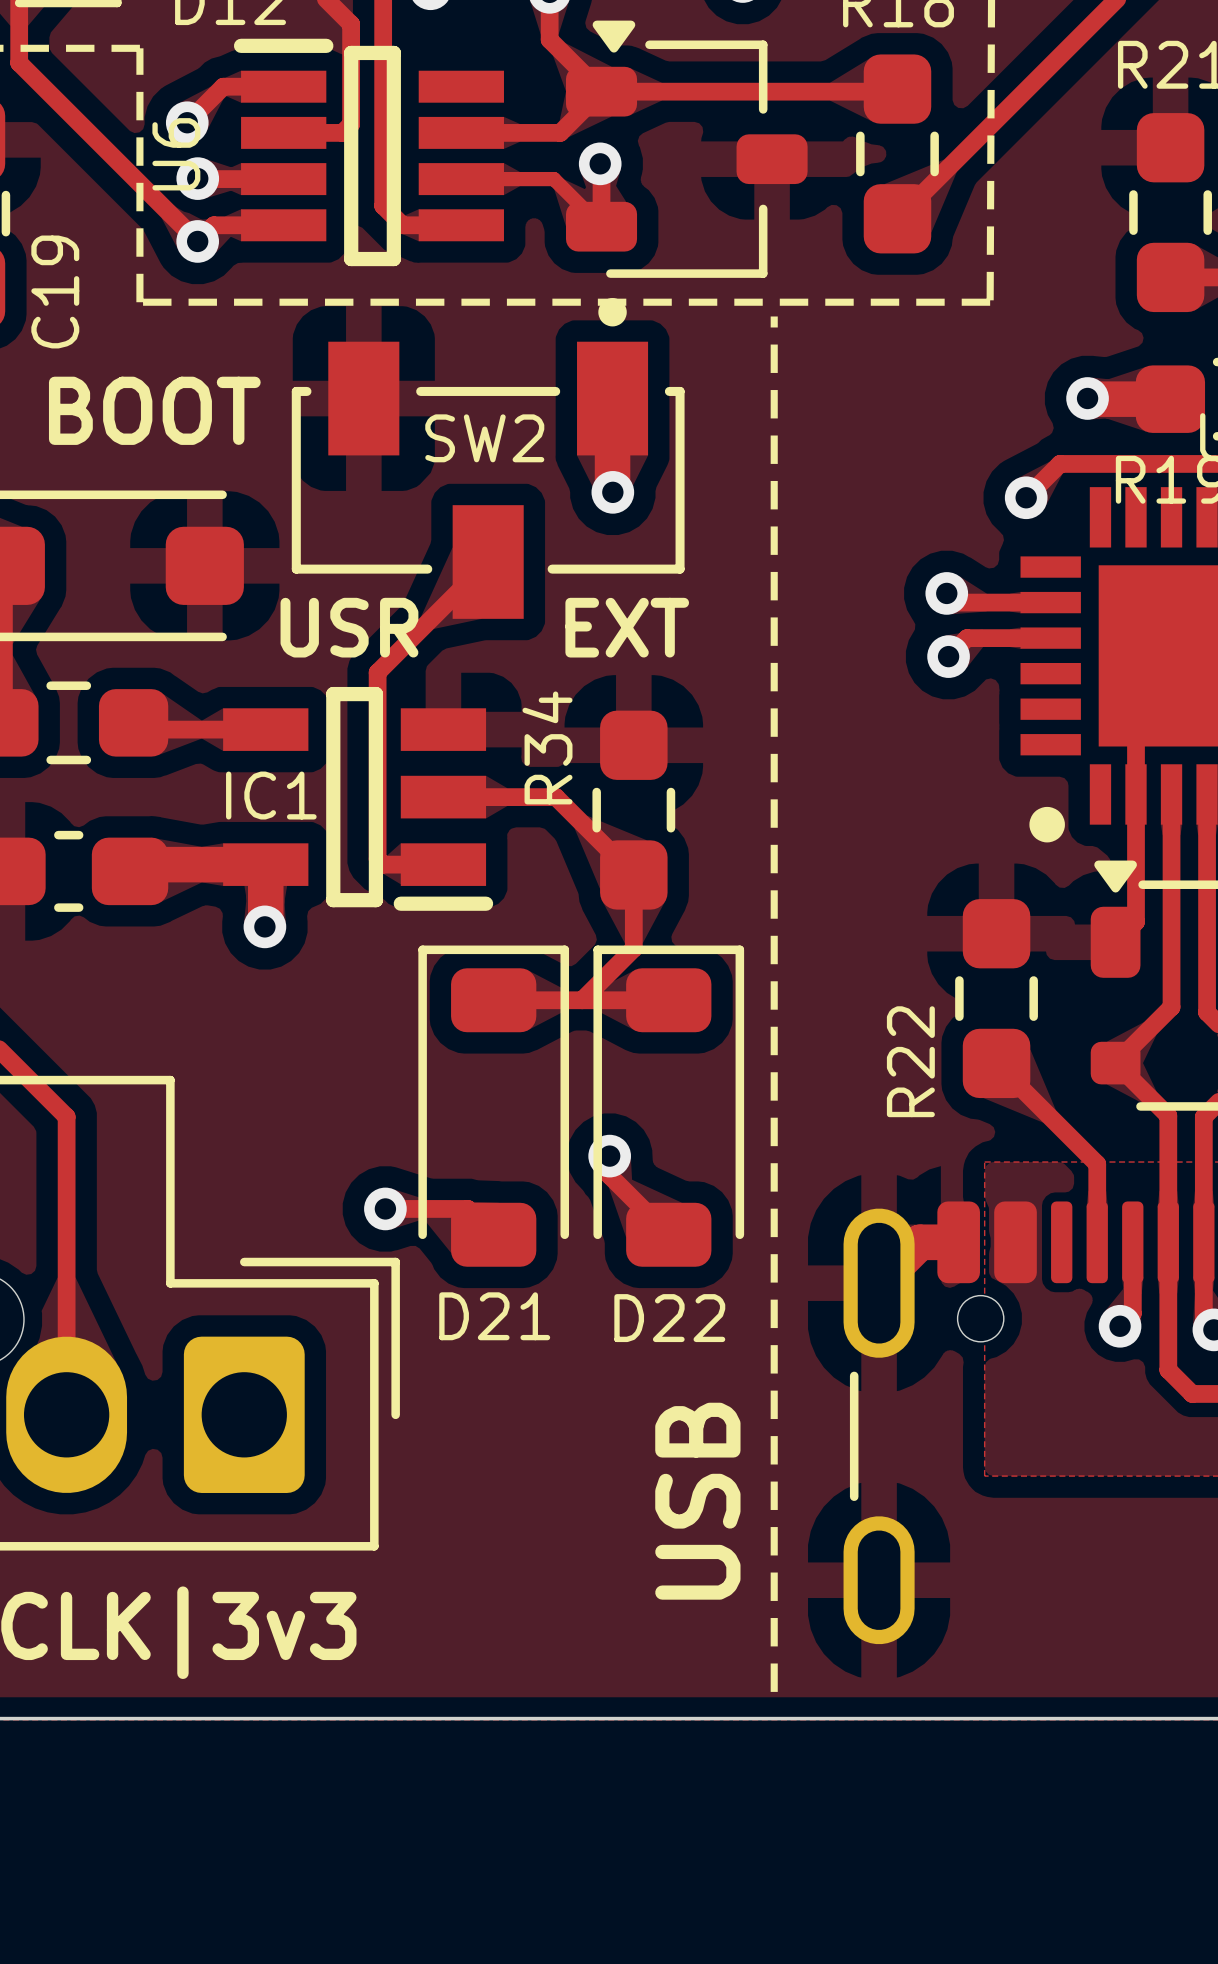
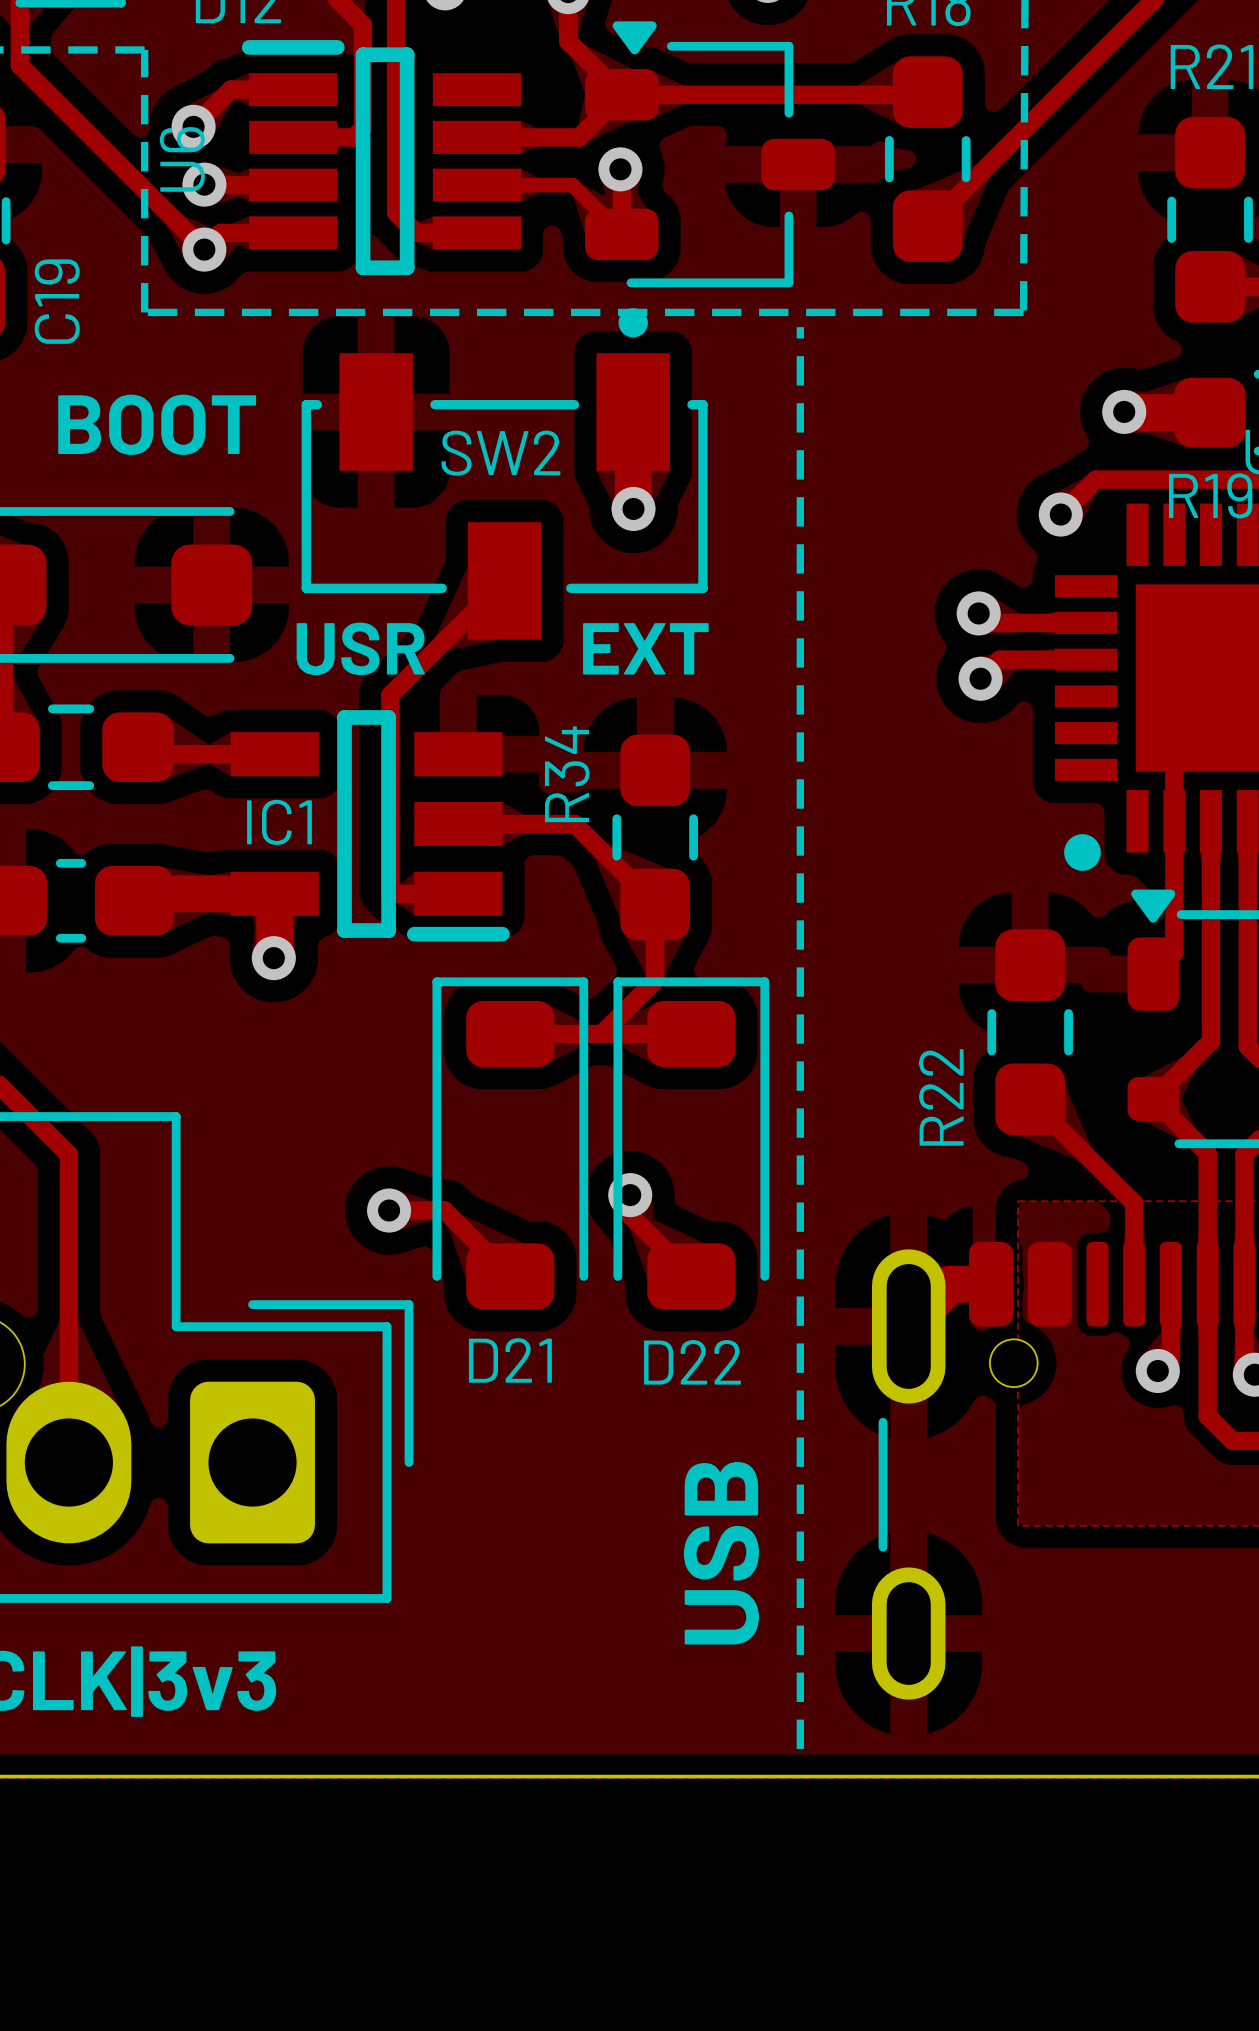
track: (385, 1208) (467, 1208) -> (389, 1210) (444, 1210) (483, 1249)
via position: (385, 1208) -> (389, 1210)

